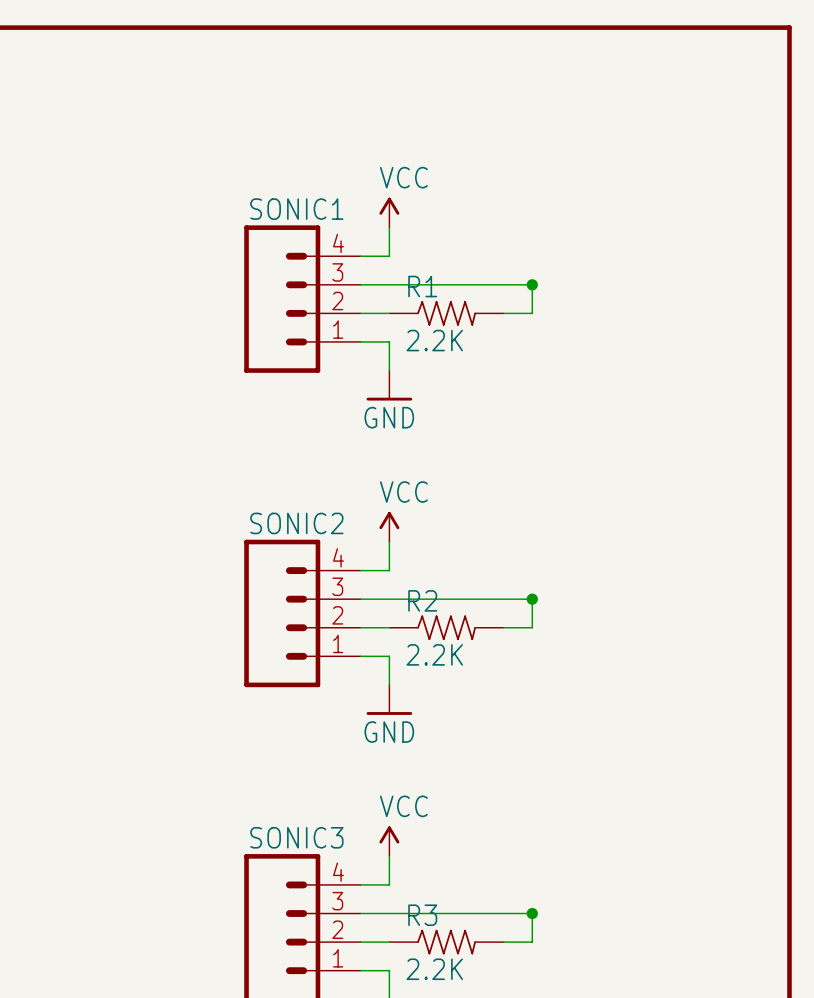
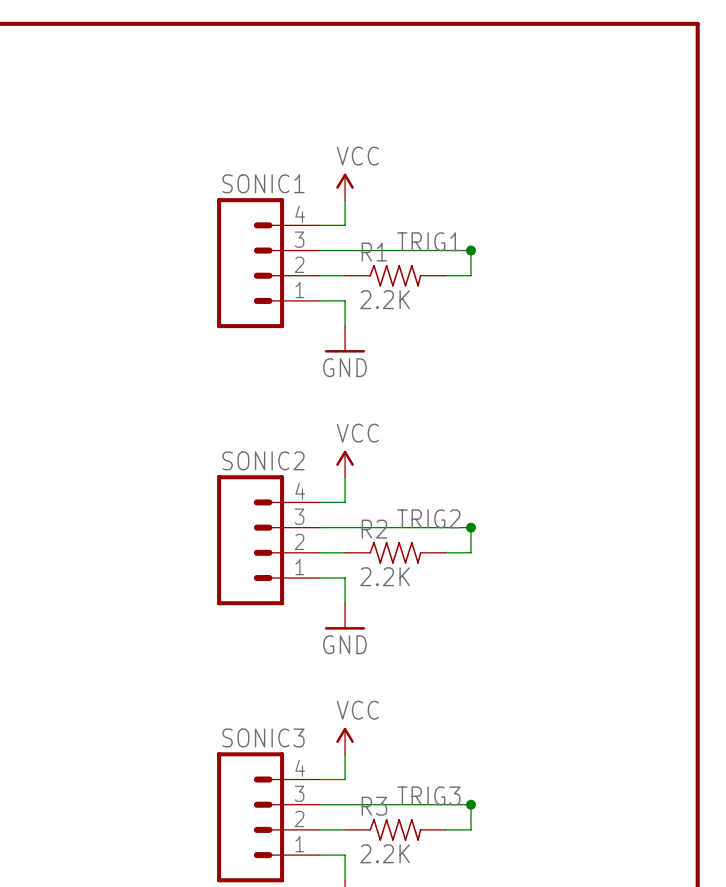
label: none -> TRIG1 (428, 241)
label: none -> TRIG2 (428, 518)
label: none -> TRIG3 (428, 795)

